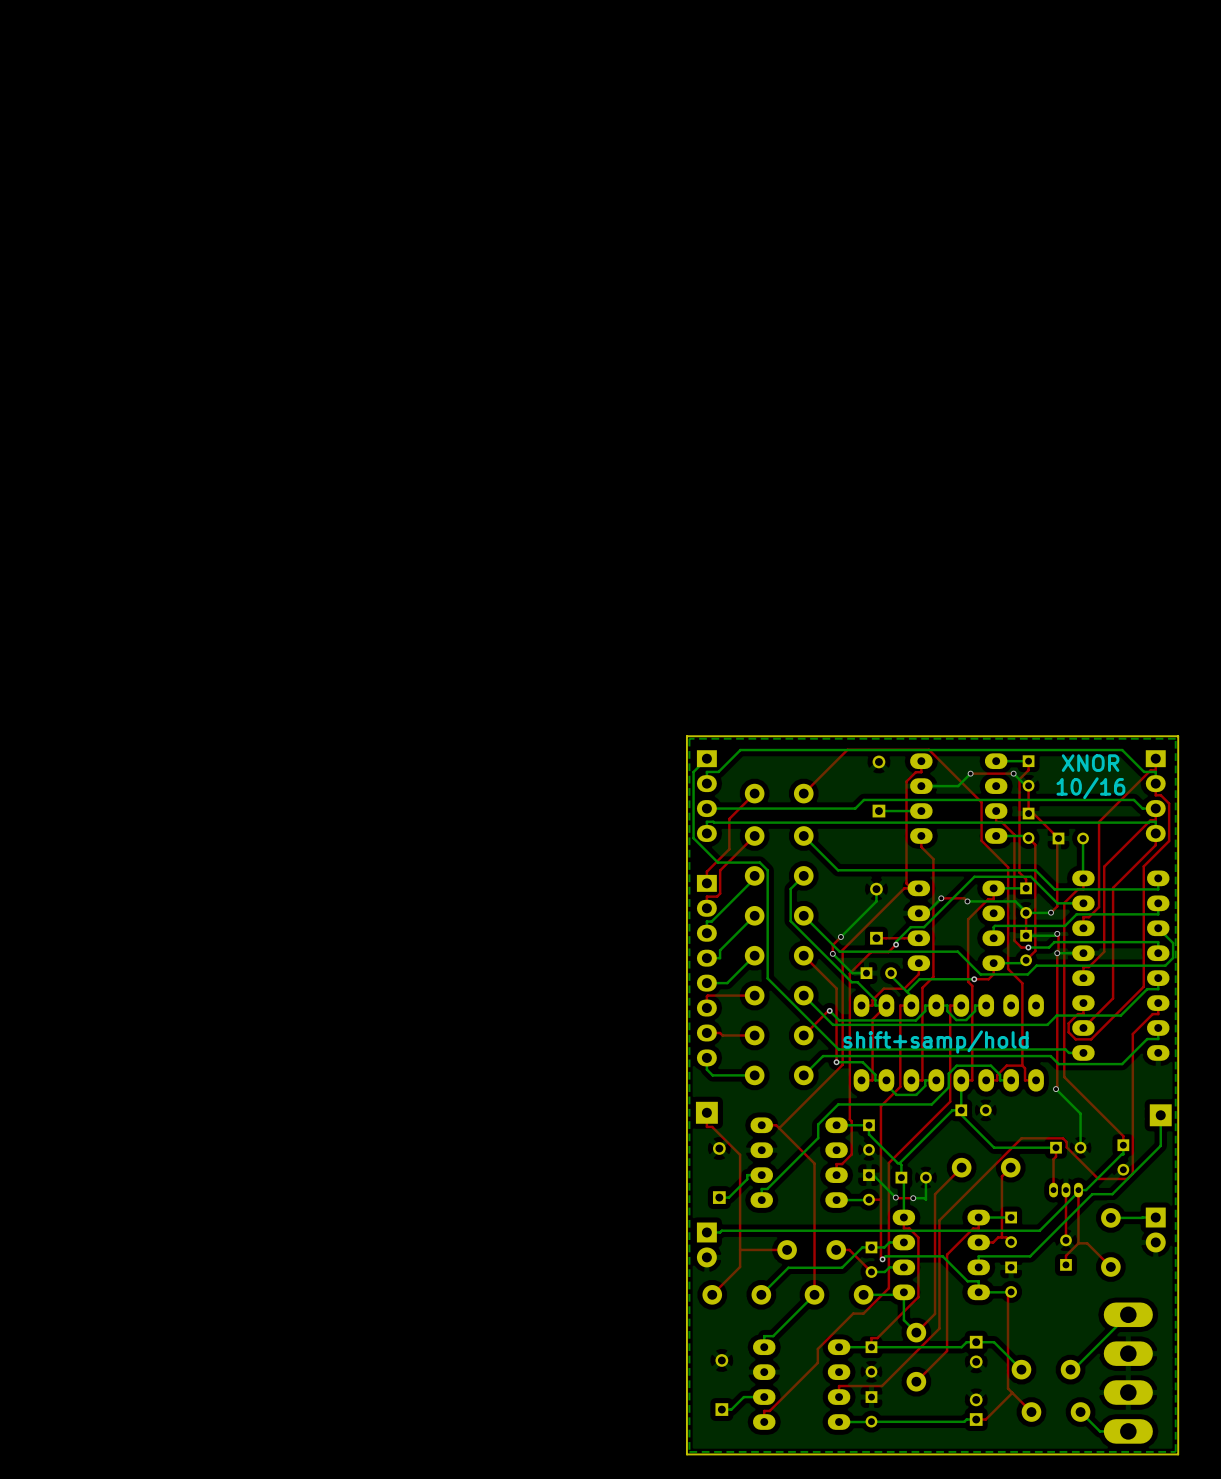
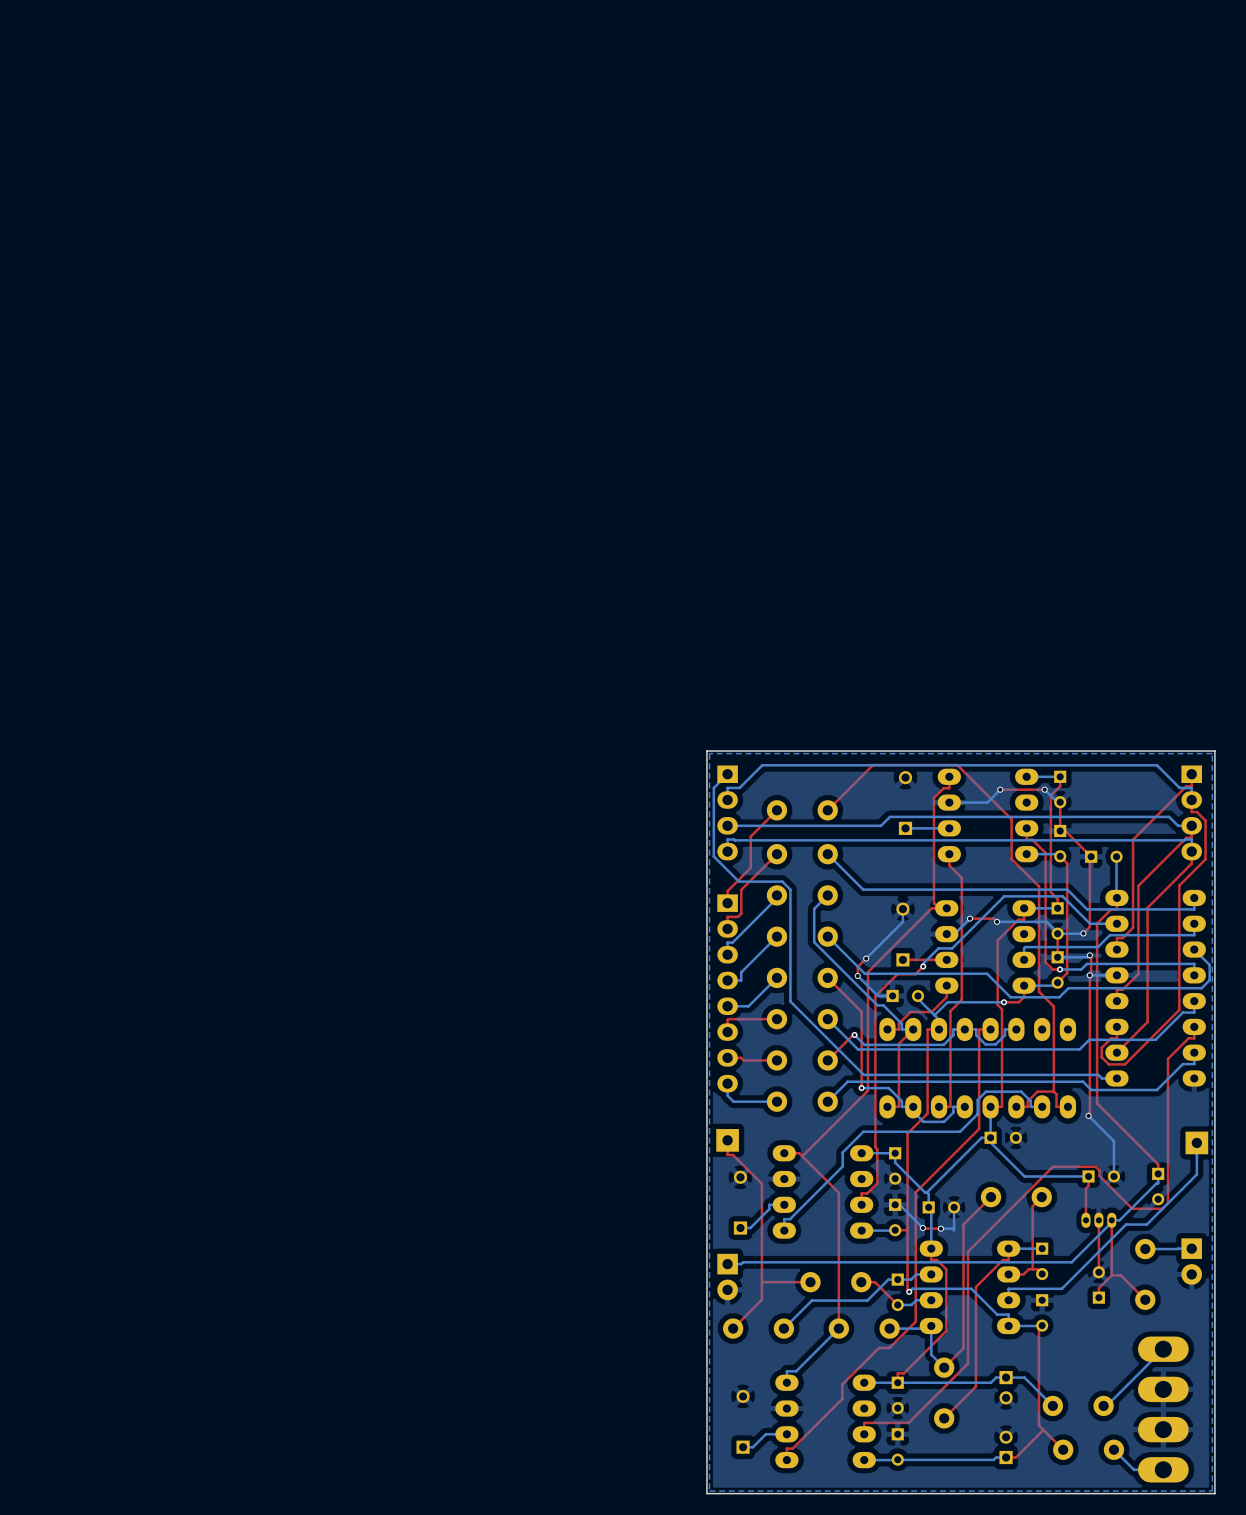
text: XNOR (1090, 763) -> none
text: 10/16 (1090, 788) -> none
text: shift+samp/hold (935, 1042) -> none

